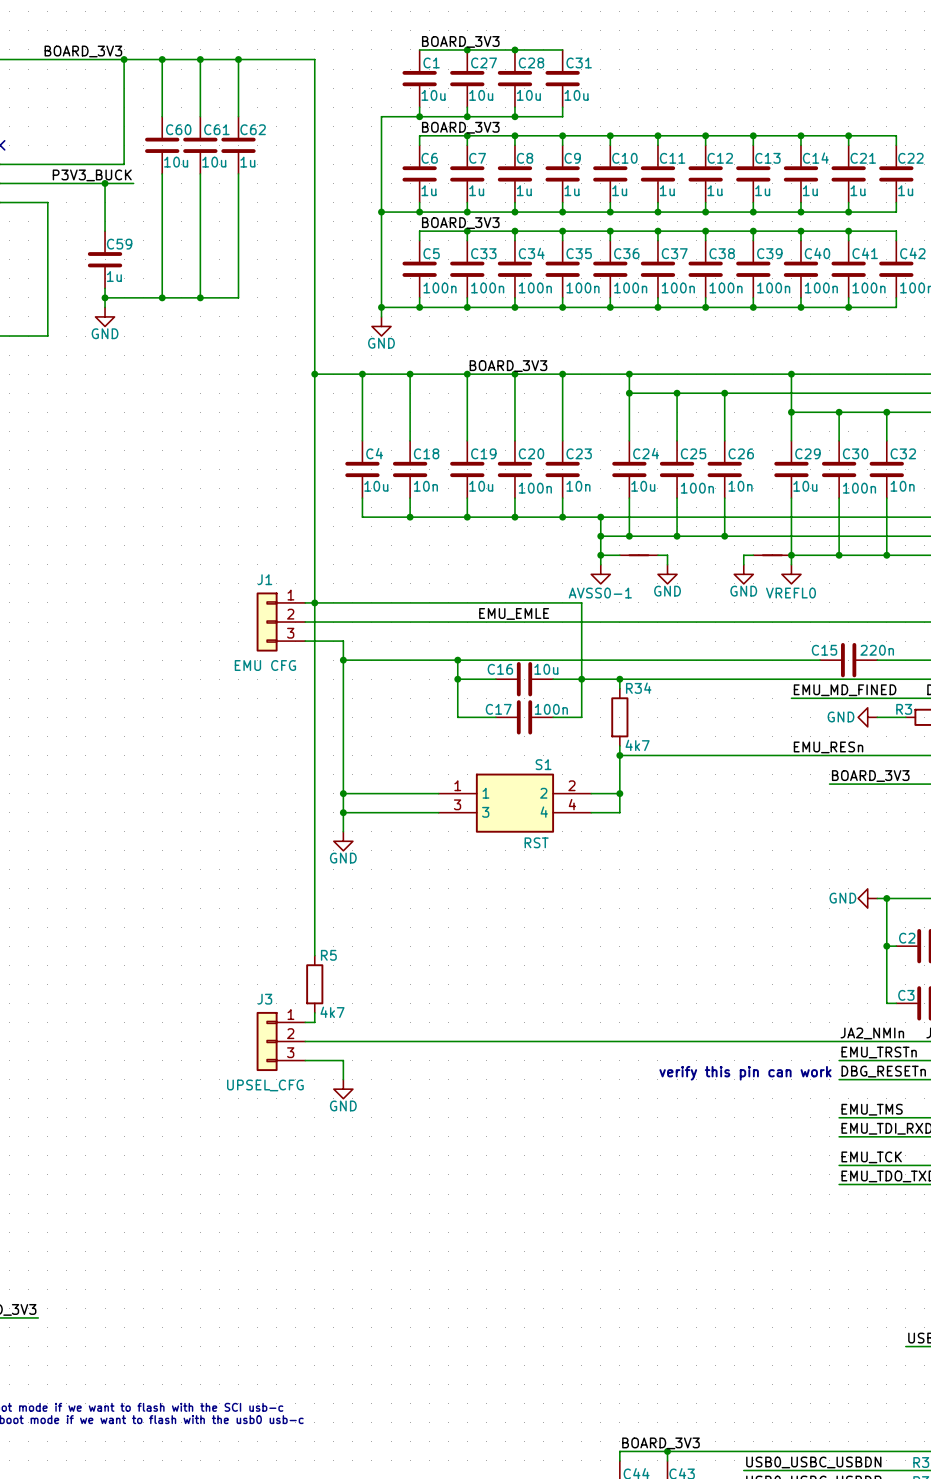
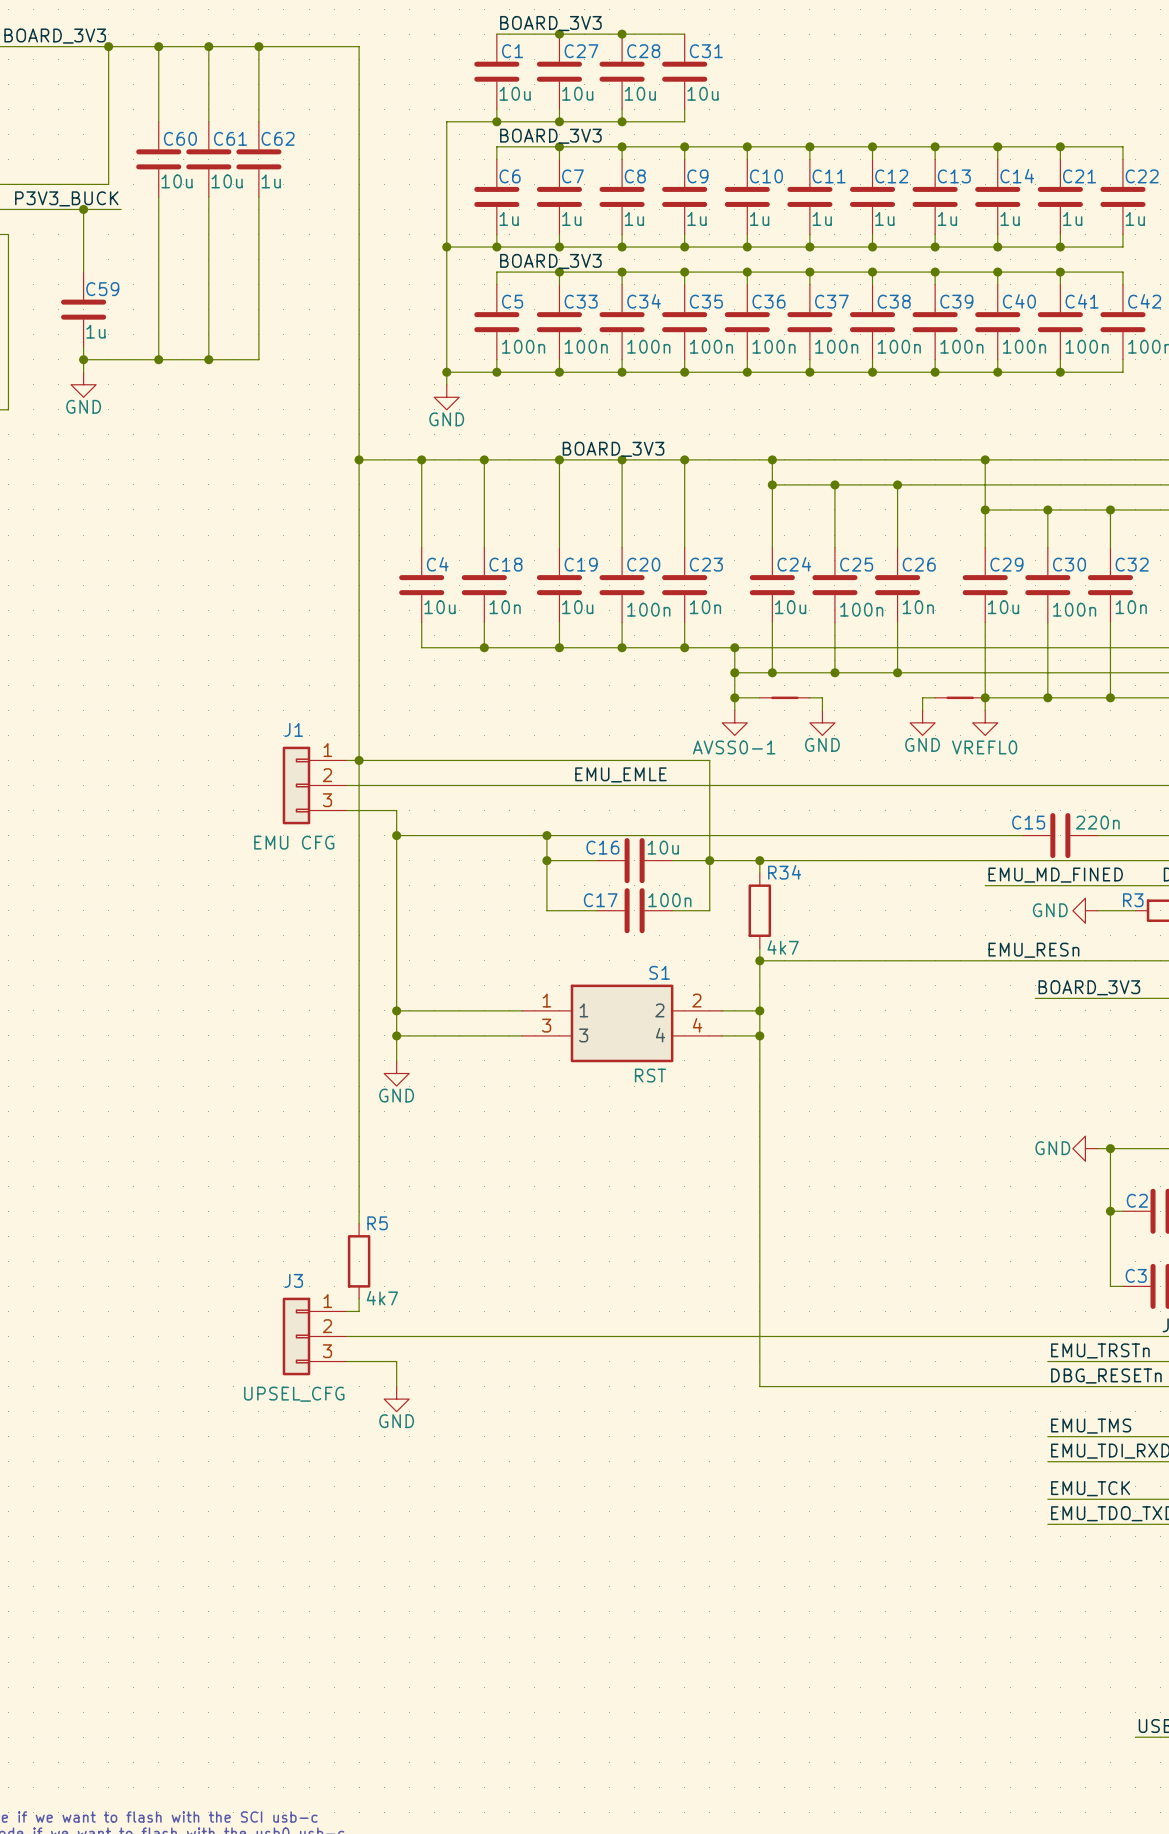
wire: none -> (759, 1035) (759, 1386) (1047, 1386)
junction: none -> (759, 1035)
label: JA2_NMIn (872, 1033) -> none
text: verify this pin can work (745, 1073) -> none

